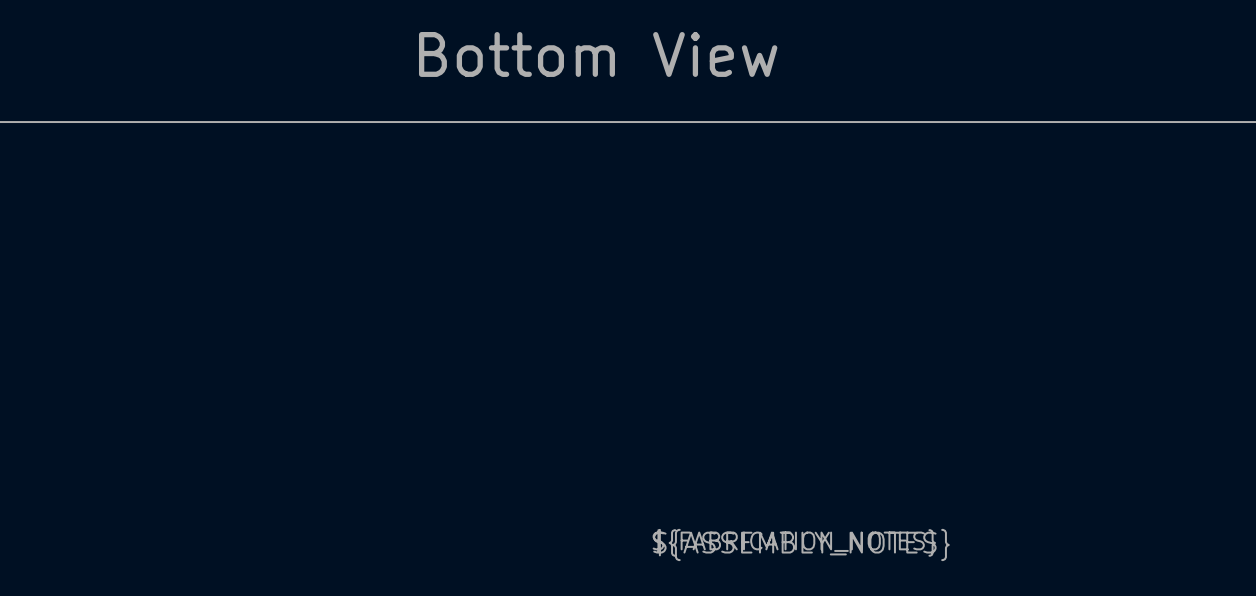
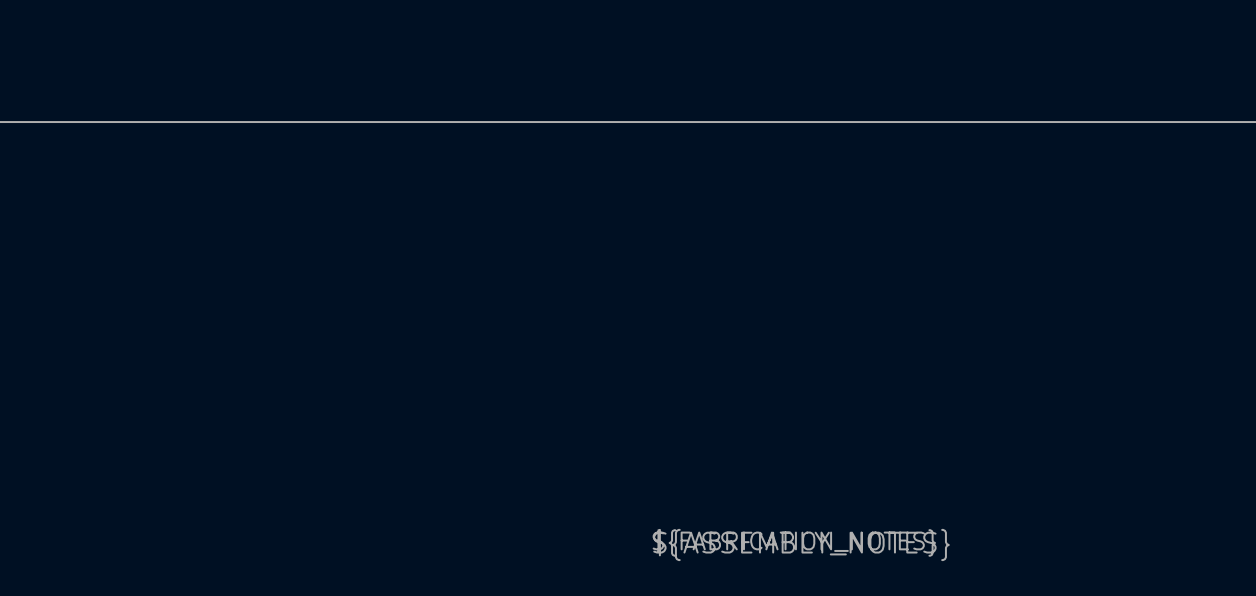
text: Bottom View (598, 54) -> none

